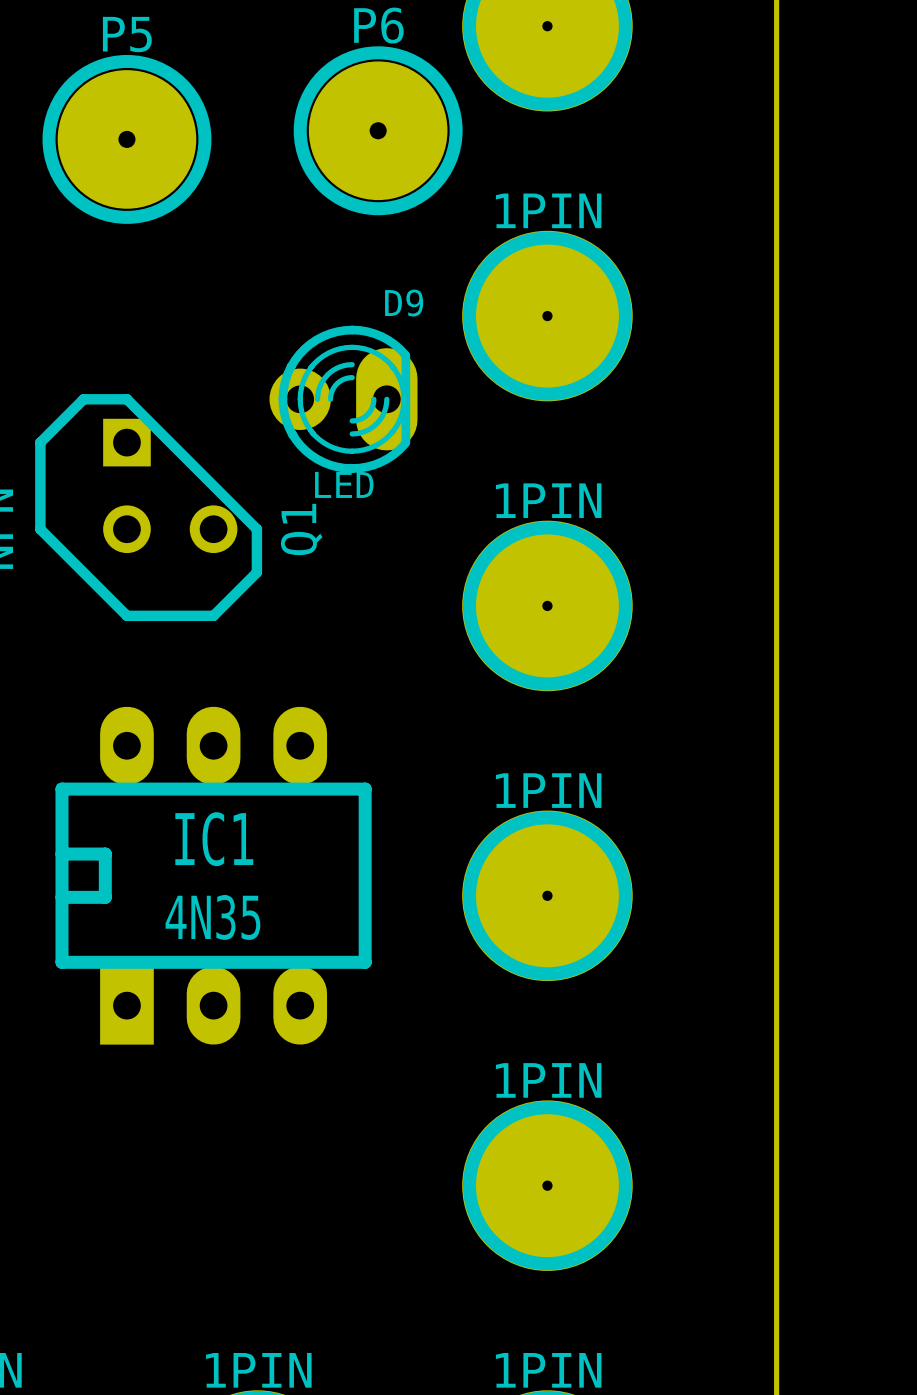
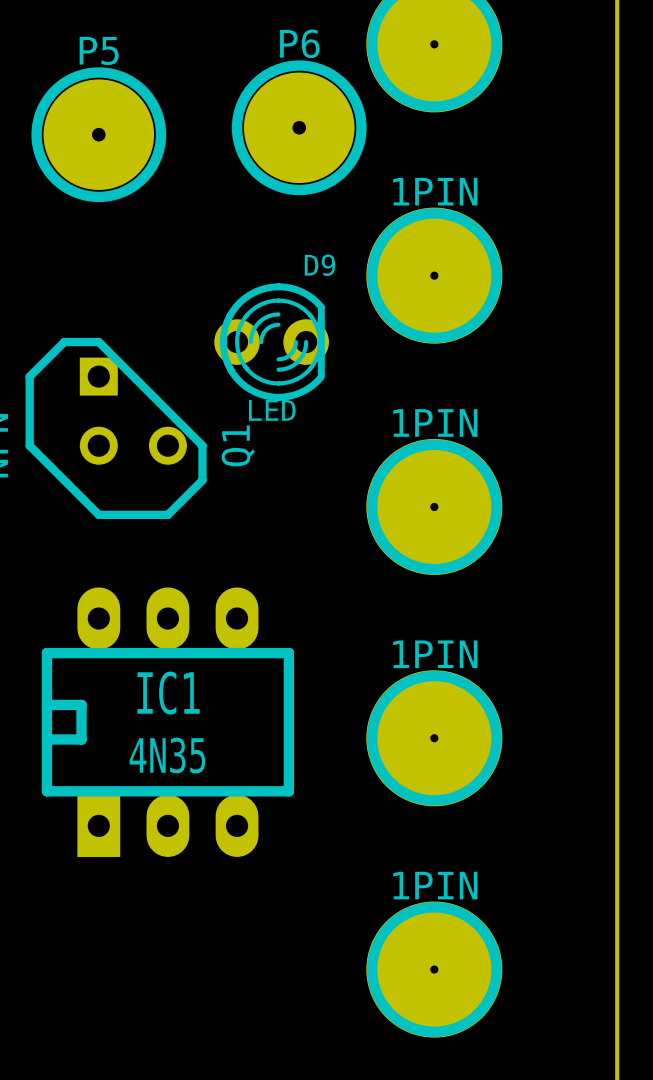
D9 footprint: [269, 325, 418, 473] -> [214, 283, 329, 401]

